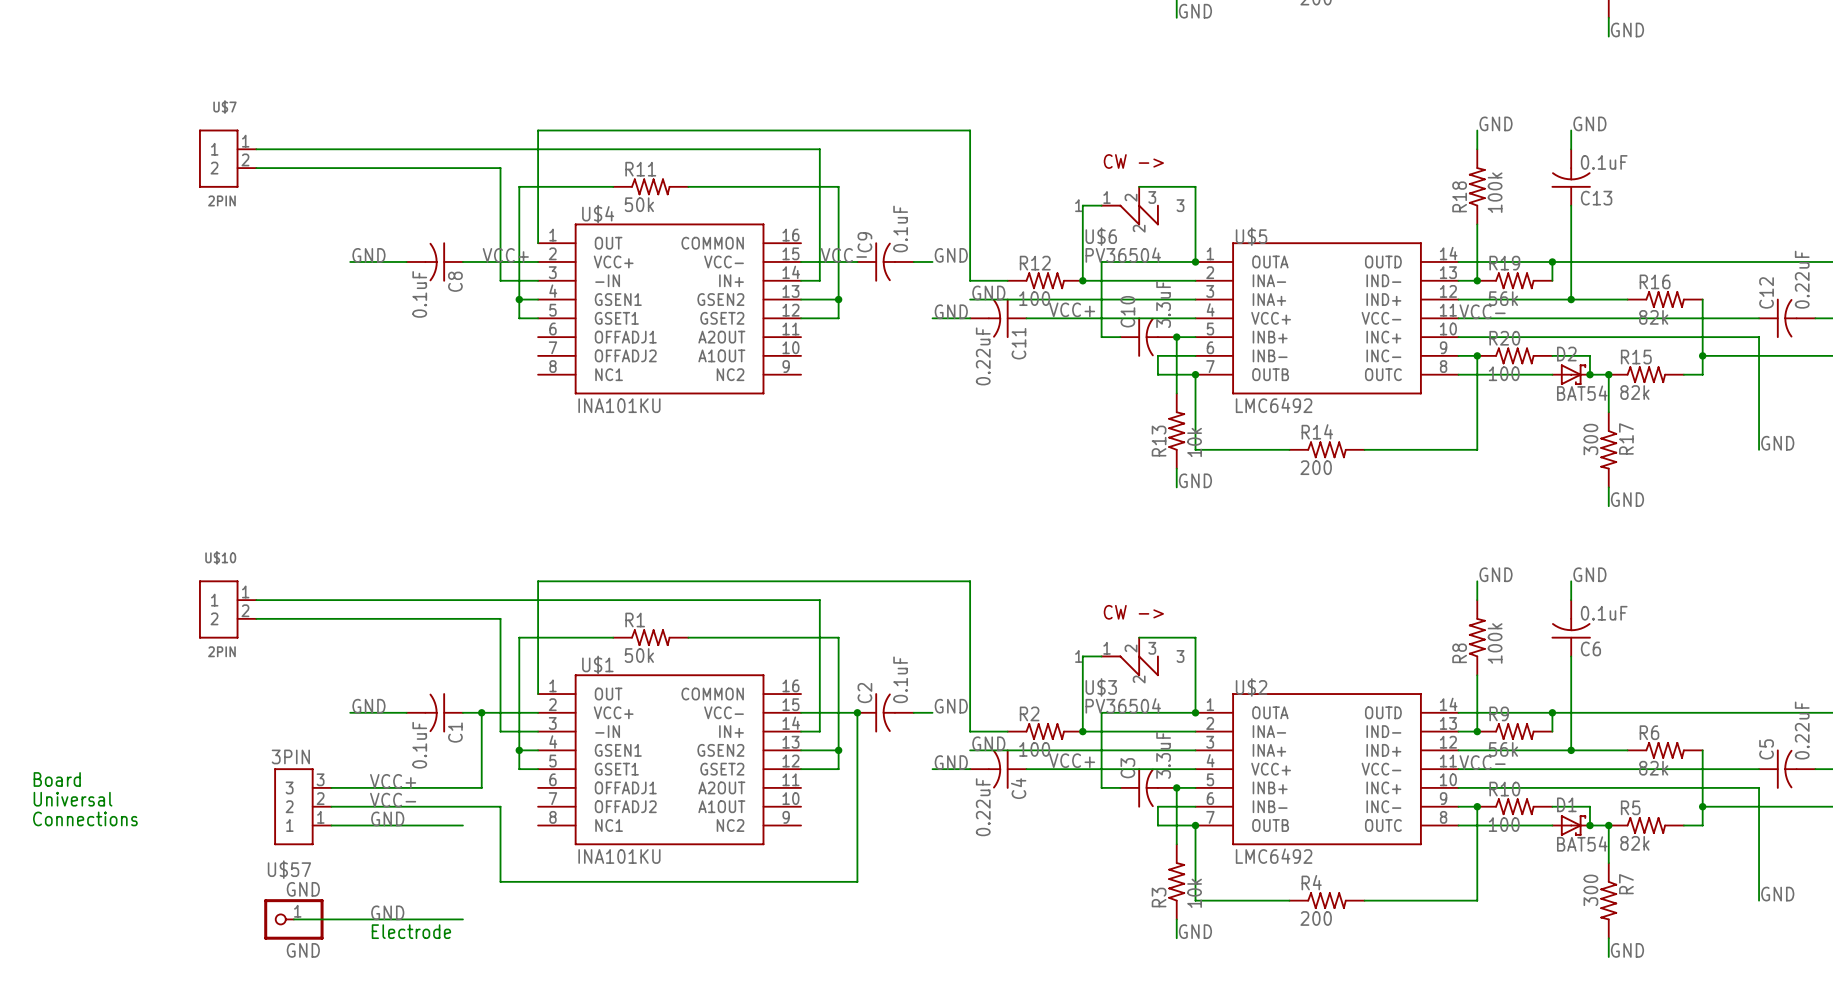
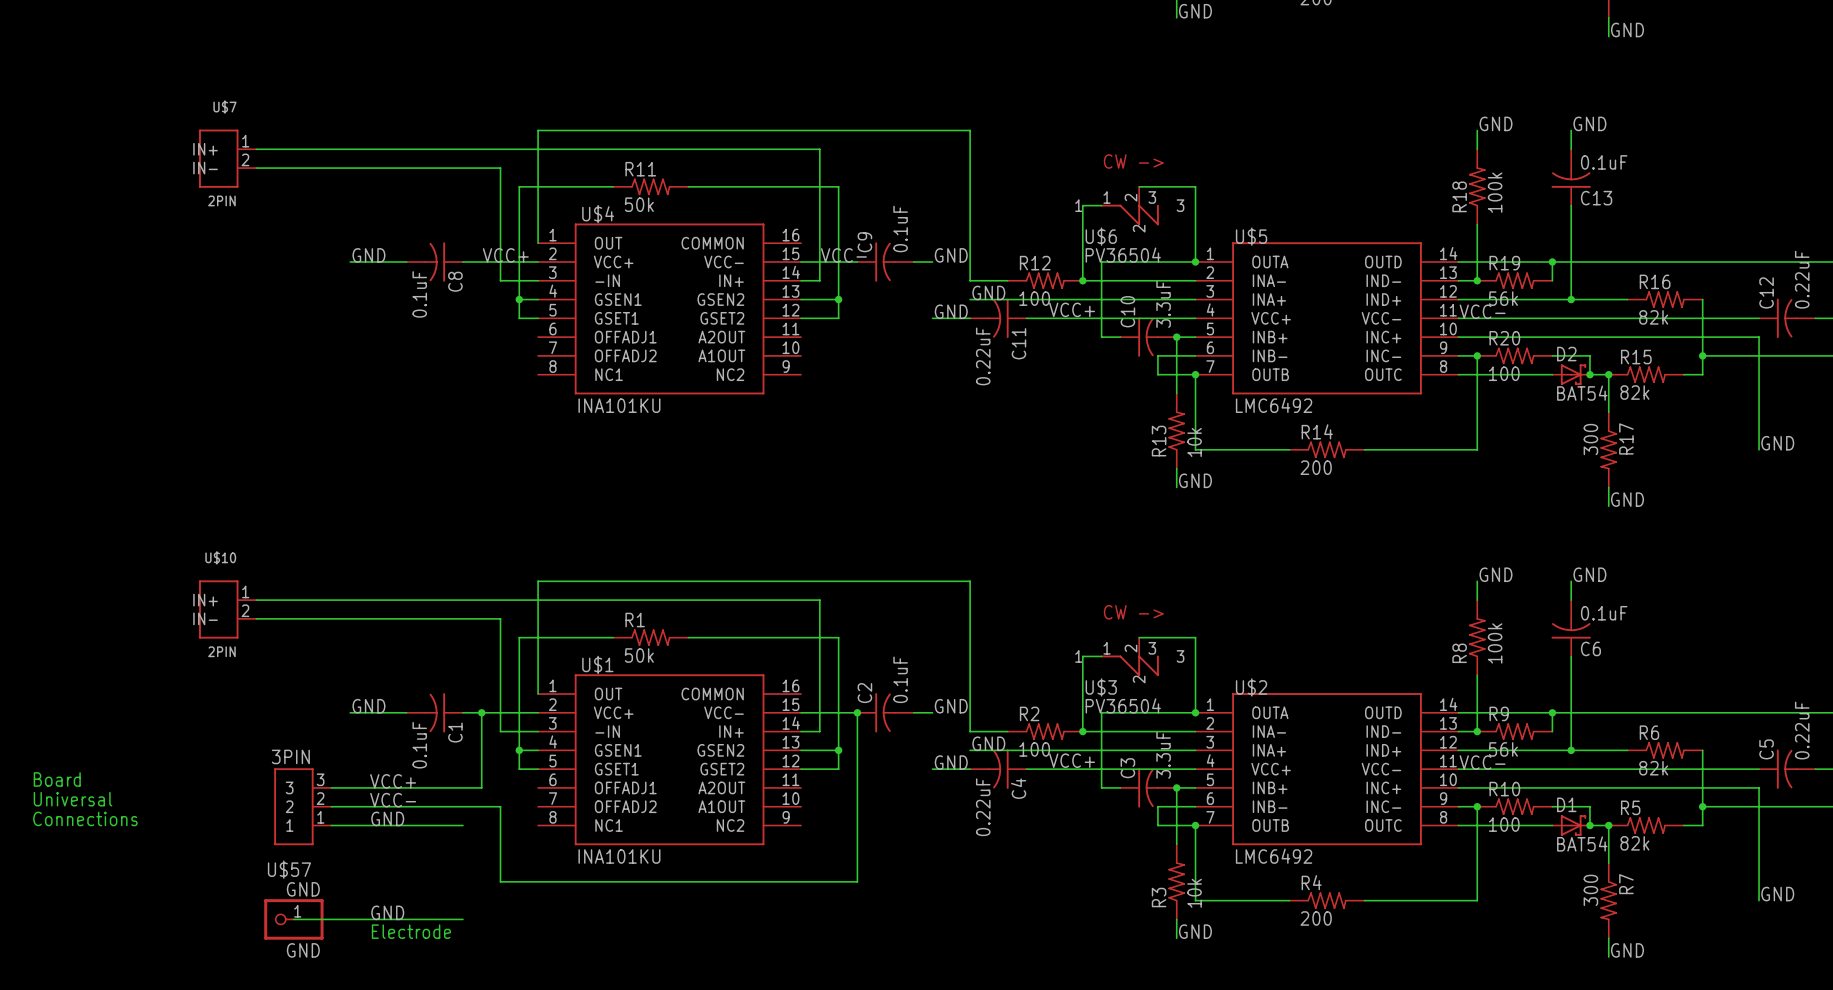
U$7 pin name: 1 (214, 149) -> IN+ (205, 149)
U$7 pin name: 2 (214, 168) -> IN- (205, 168)
U$10 pin name: 1 (214, 600) -> IN+ (205, 600)
U$10 pin name: 2 (214, 618) -> IN- (205, 618)

